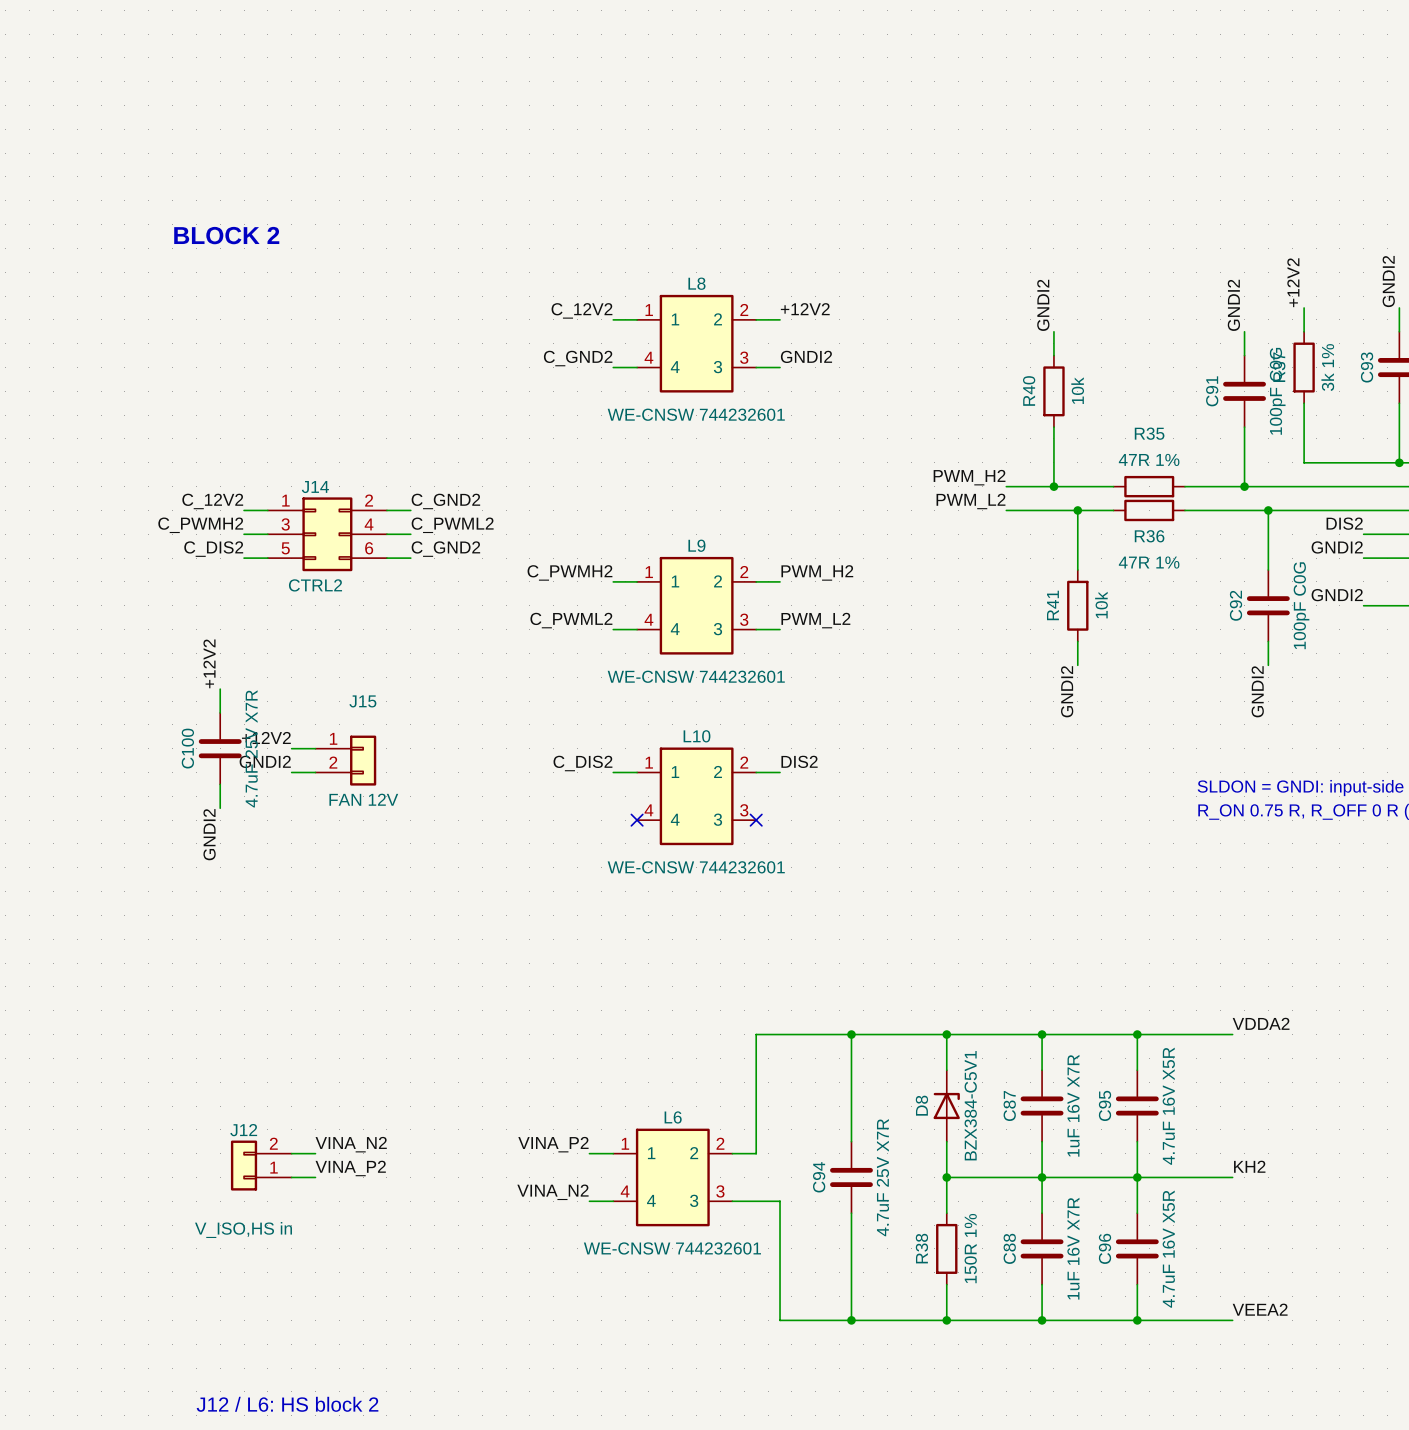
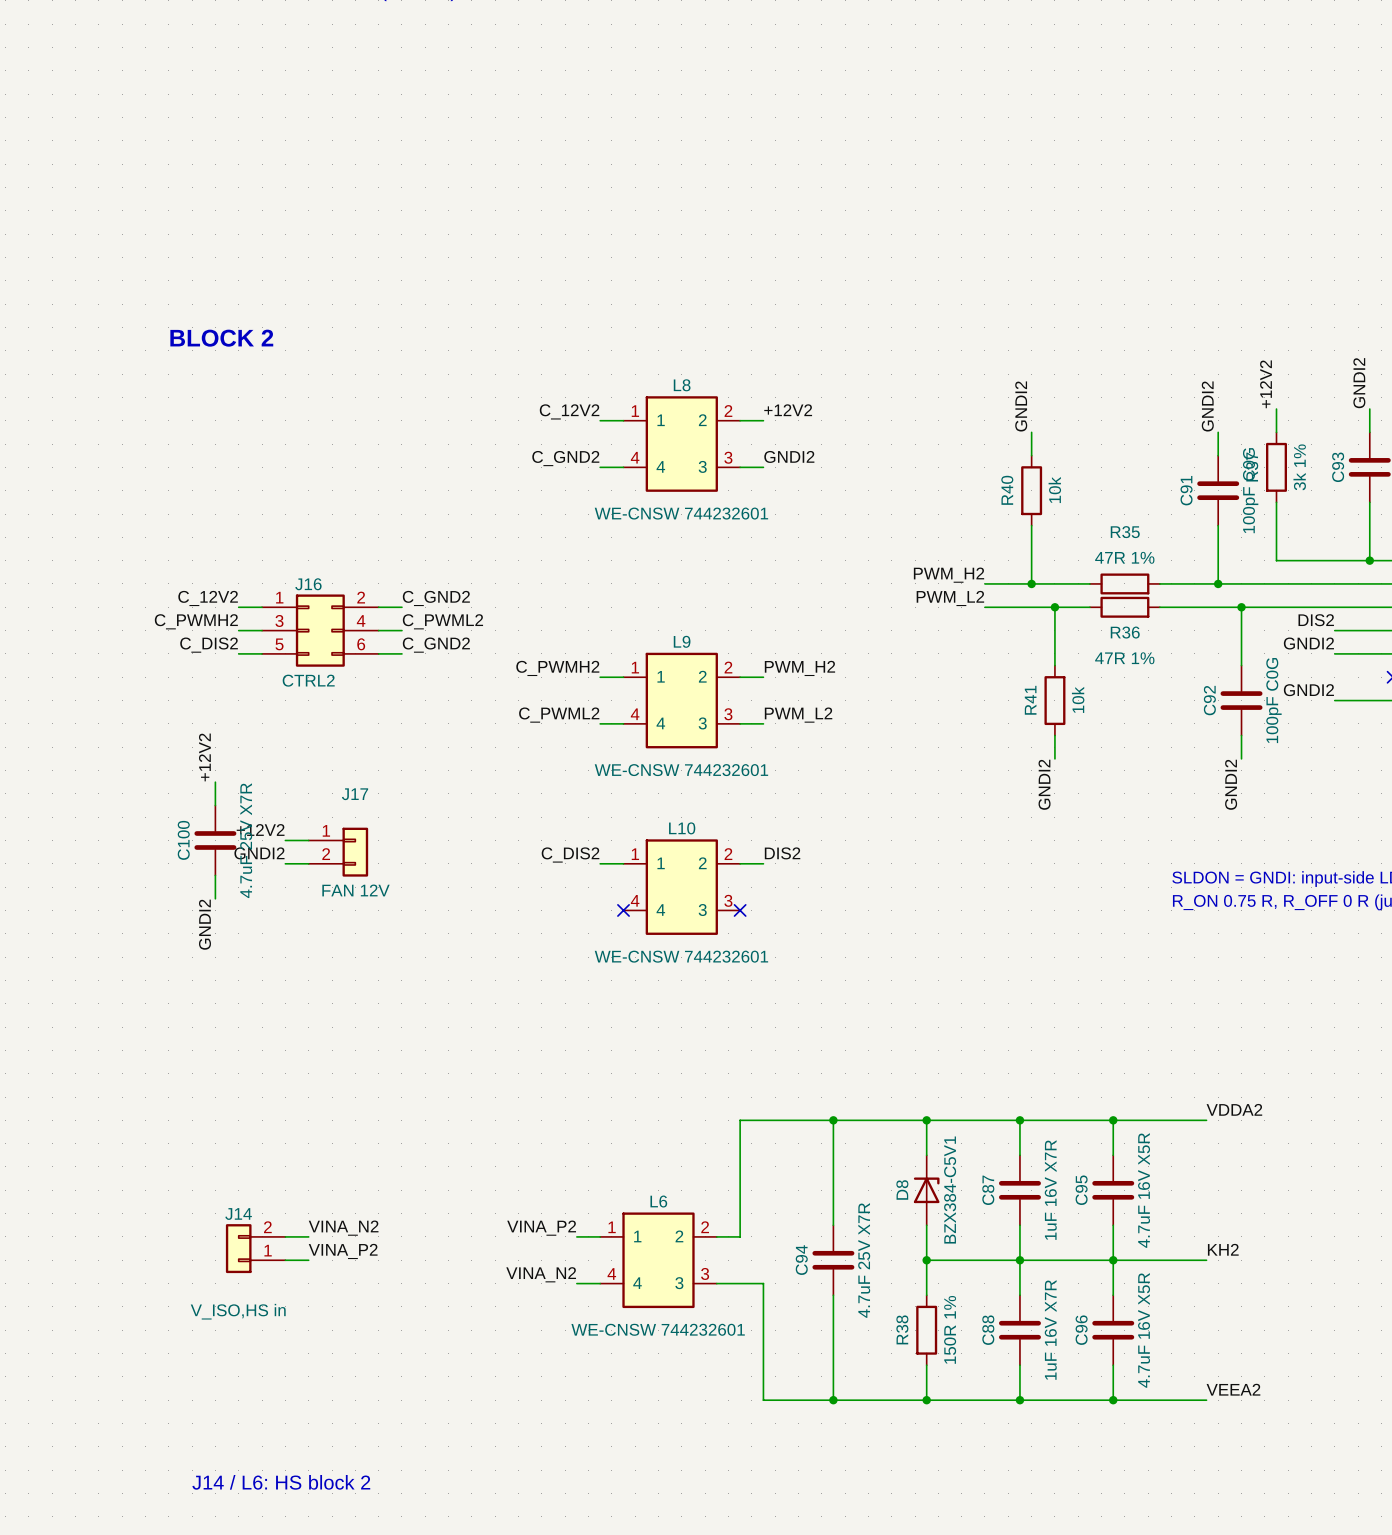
J14 name: J14 (315, 487) -> J16 (308, 584)
J15 name: J15 (362, 701) -> J17 (355, 794)
J12 name: J12 (243, 1130) -> J14 (238, 1214)
text: J12 / L6: HS block 2 (287, 1404) -> J14 / L6: HS block 2 (281, 1482)

